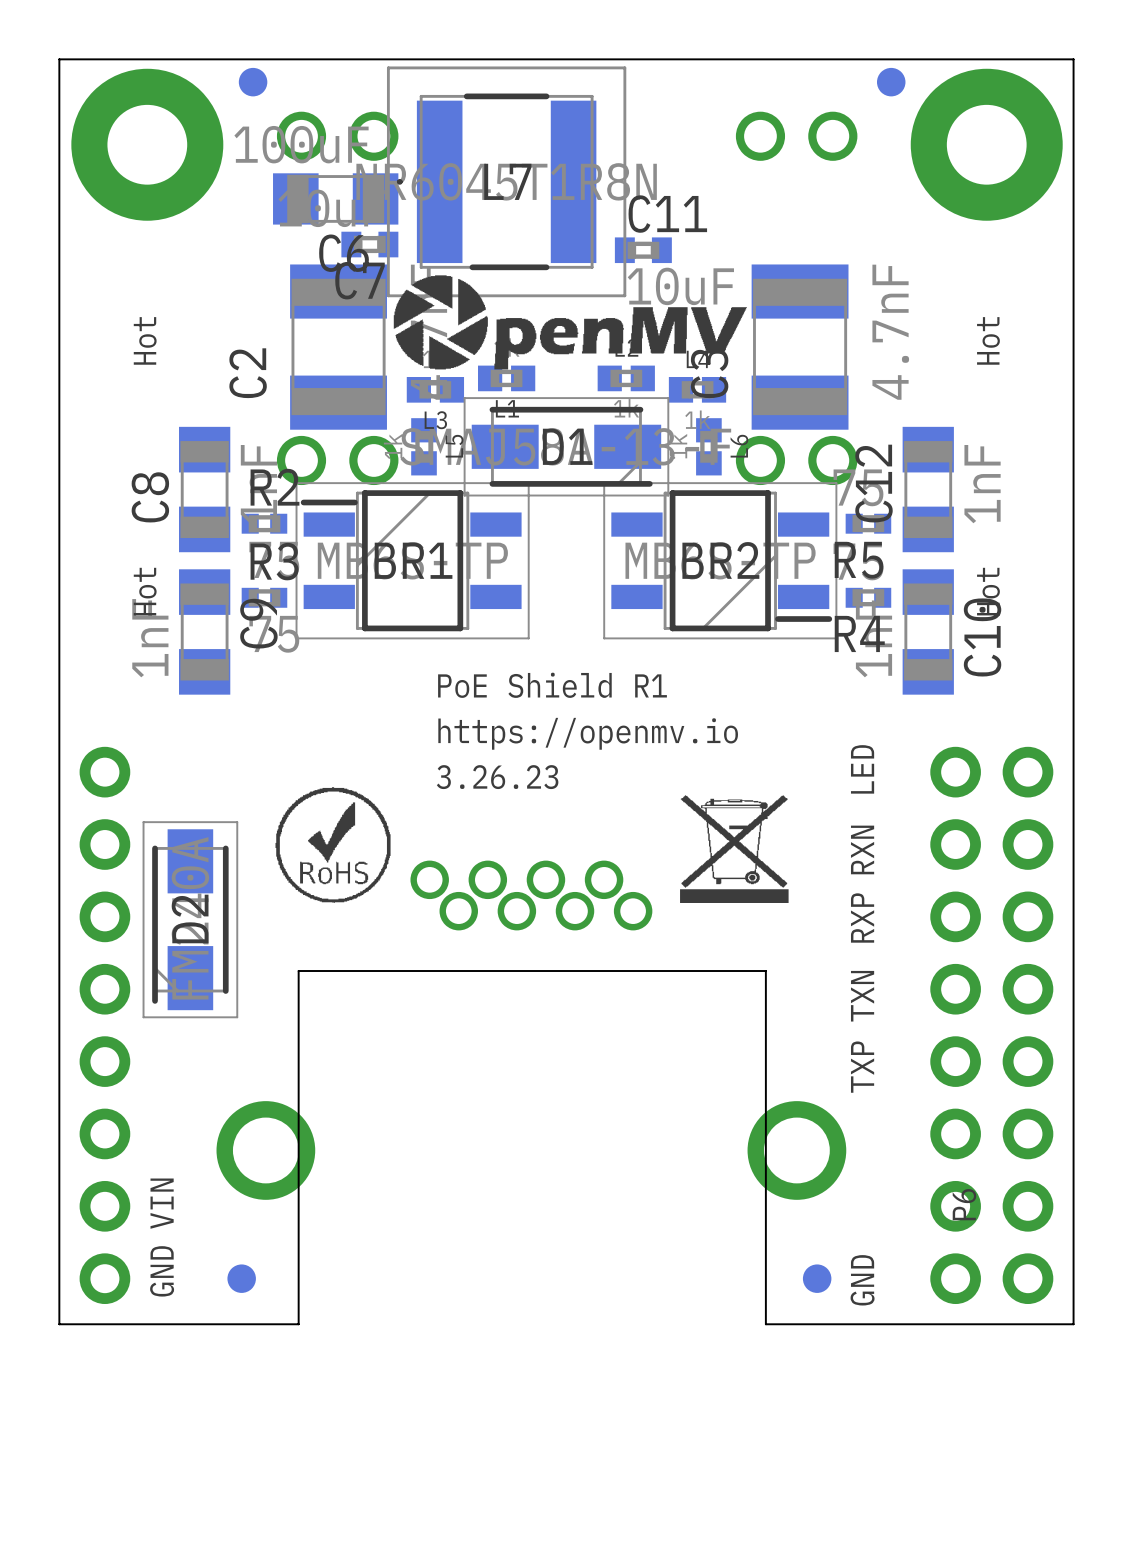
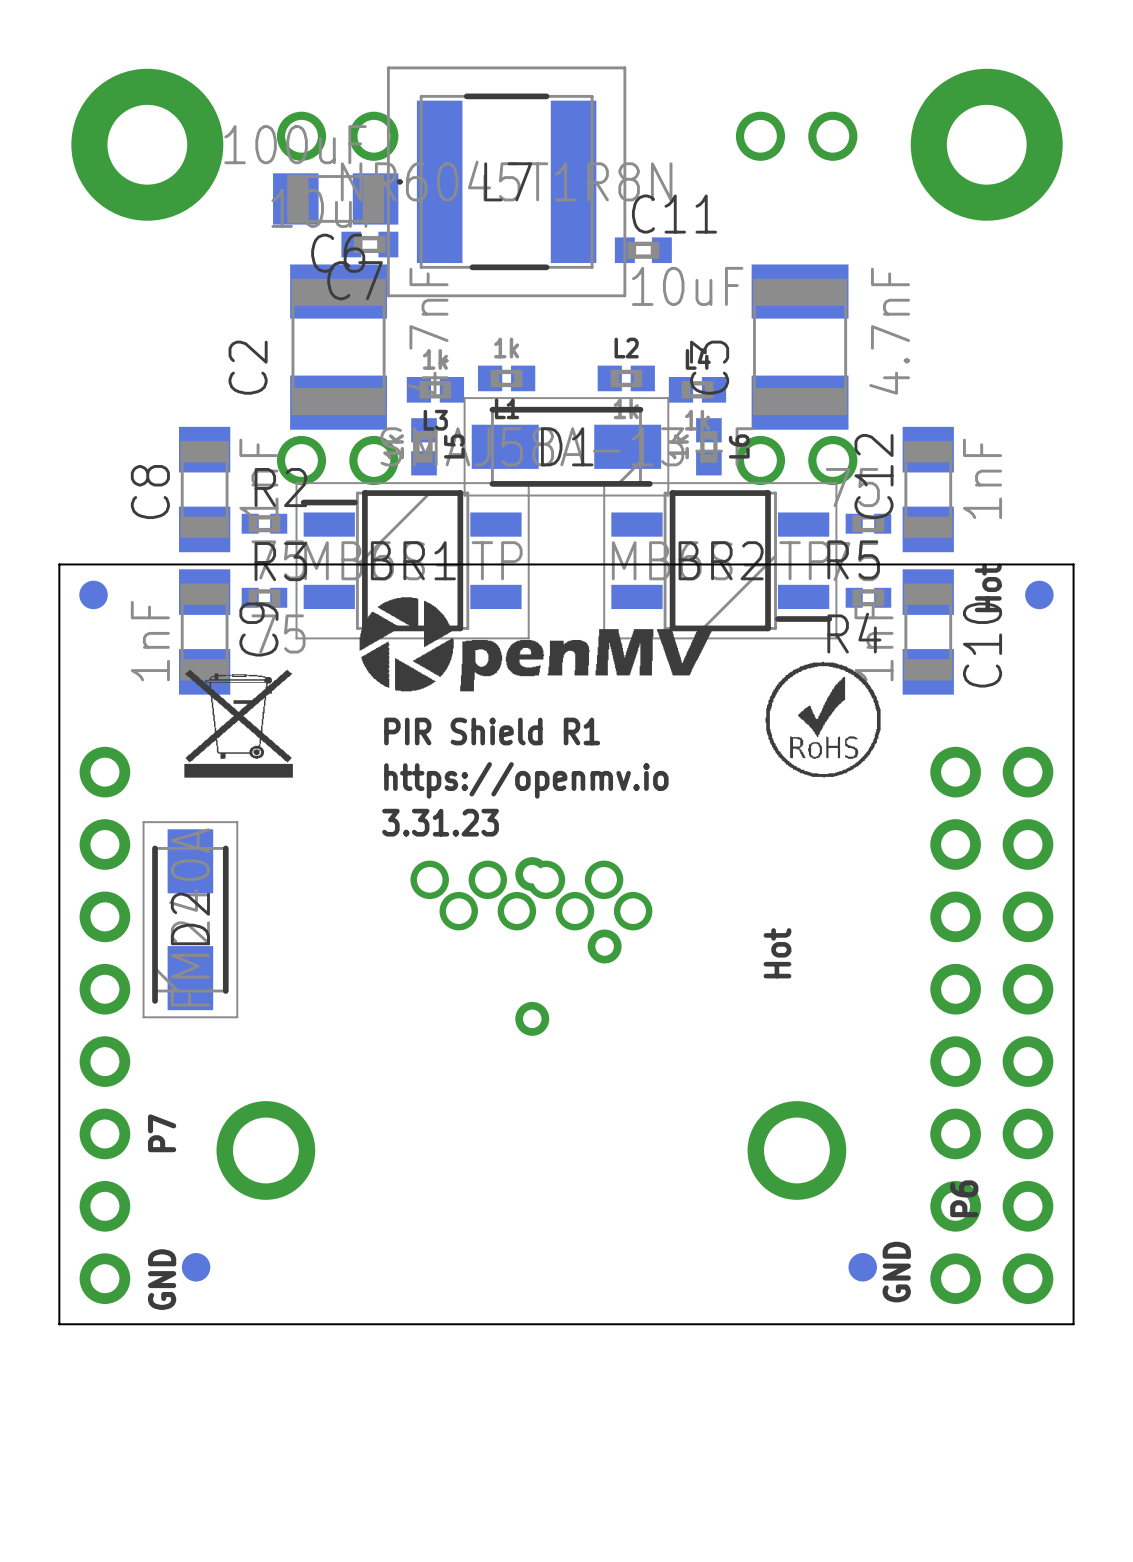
part: (253, 82) -> none
part: (891, 82) -> none
drawing position: (570, 322) -> (536, 644)
text: Hot (145, 340) -> none
text: Hot (988, 340) -> none
board edge: (1073, 564) (1073, 59) (59, 59) (59, 564) -> (1073, 564) (59, 564)
text: Hot (145, 591) -> none
part: none -> (93, 594)
part: none -> (1039, 594)
text: PoE Shield R1 (552, 685) -> PIR Shield R1 (492, 731)
text position: https://openmv.io (588, 733) -> https://openmv.io (526, 780)
text: LED (862, 769) -> none
text: 3.26.23 (497, 777) -> 3.31.23 (440, 822)
drawing position: (333, 845) -> (823, 719)
drawing position: (734, 849) -> (238, 723)
text: RXN (862, 849) -> none
text: RXP (862, 917) -> none
part: none -> (568, 946)
text: none -> Hot (777, 953)
text: TXN (862, 996) -> none
text: TXP (862, 1067) -> none
text: none -> P7 (162, 1133)
text: VIN (162, 1203) -> none
part position: (241, 1278) -> (196, 1267)
part position: (817, 1278) -> (862, 1267)
text position: GND (862, 1280) -> GND (896, 1272)
board edge: (765, 1324) (765, 971) (298, 971) (298, 1324) -> (765, 1324) (298, 1324)

